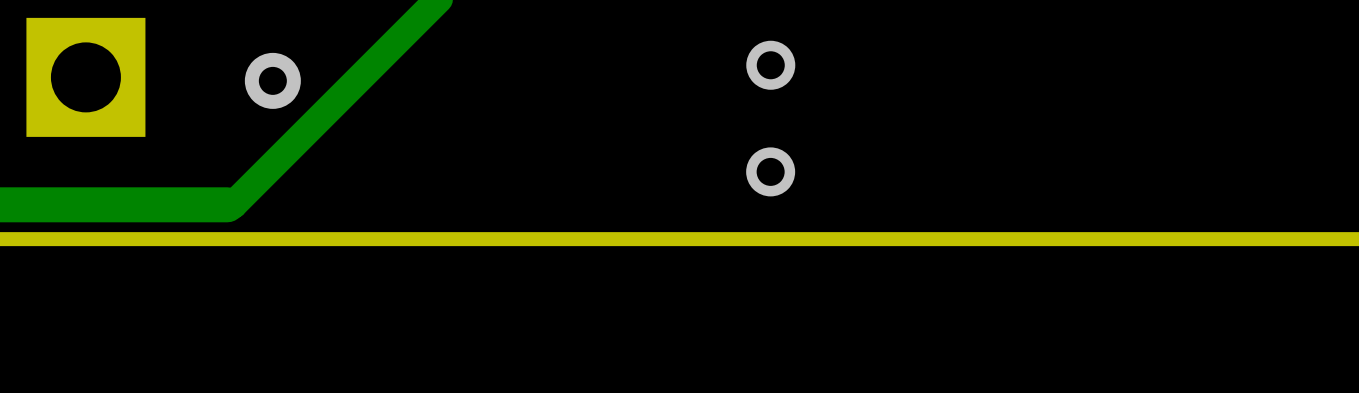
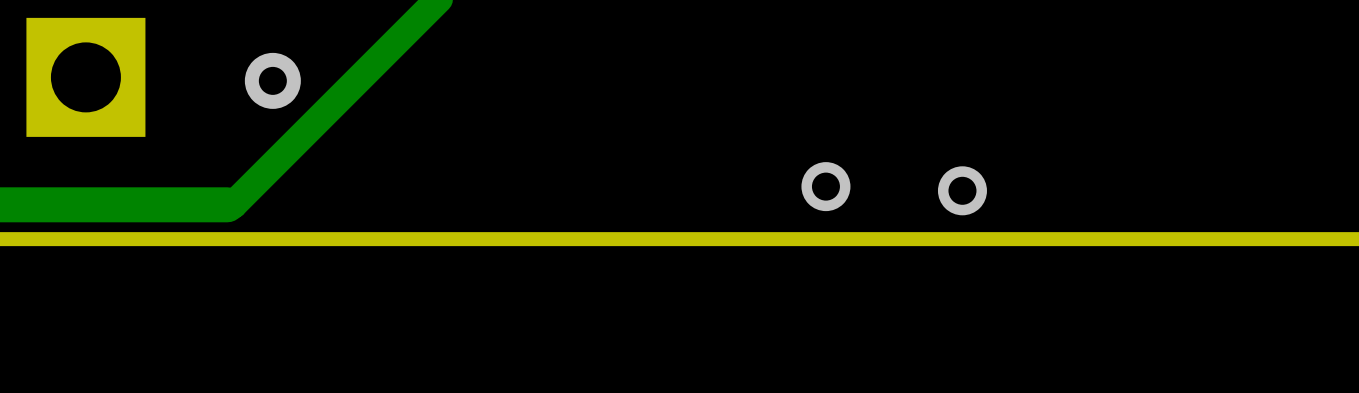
via: (770, 65) -> none
via position: (770, 171) -> (825, 186)
via: none -> (962, 190)

